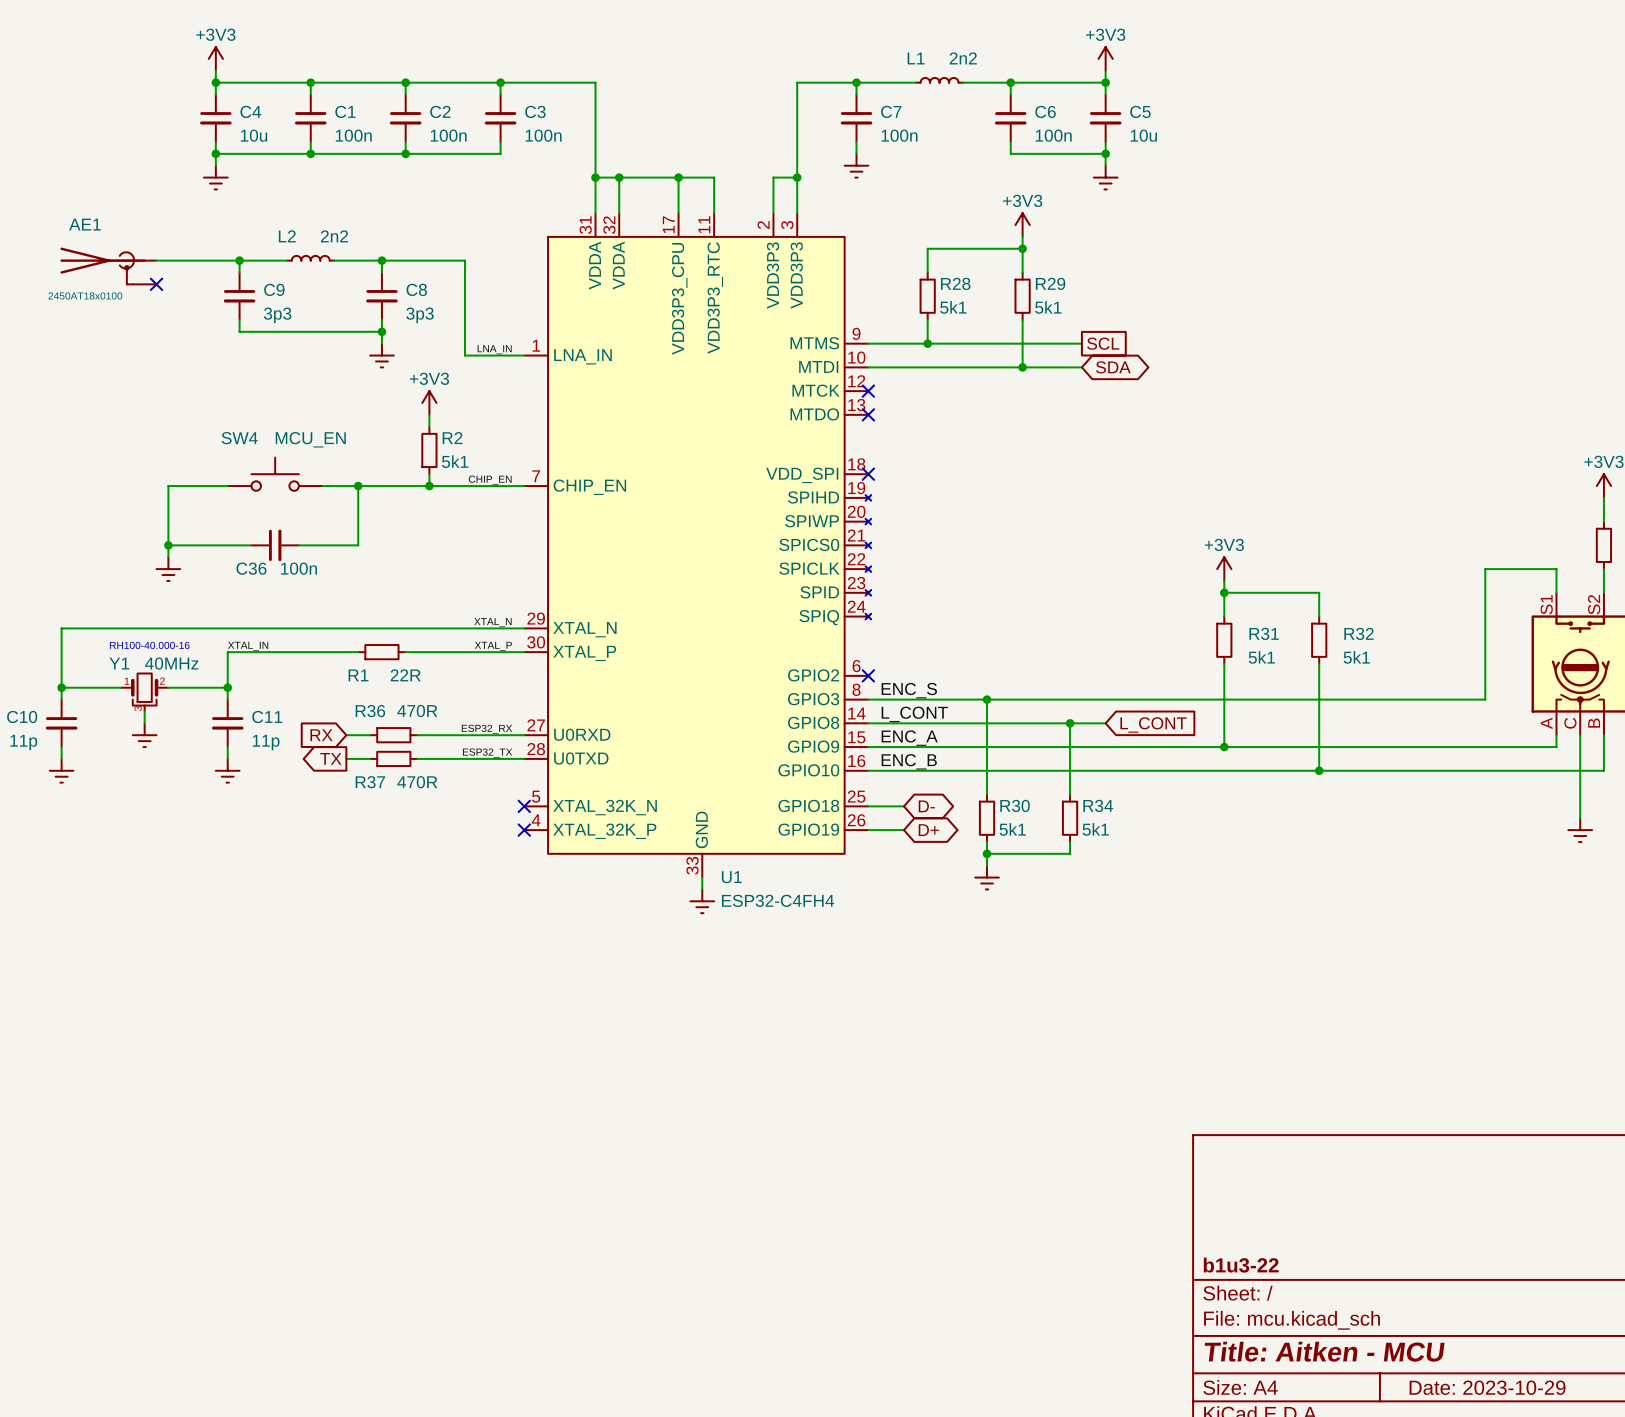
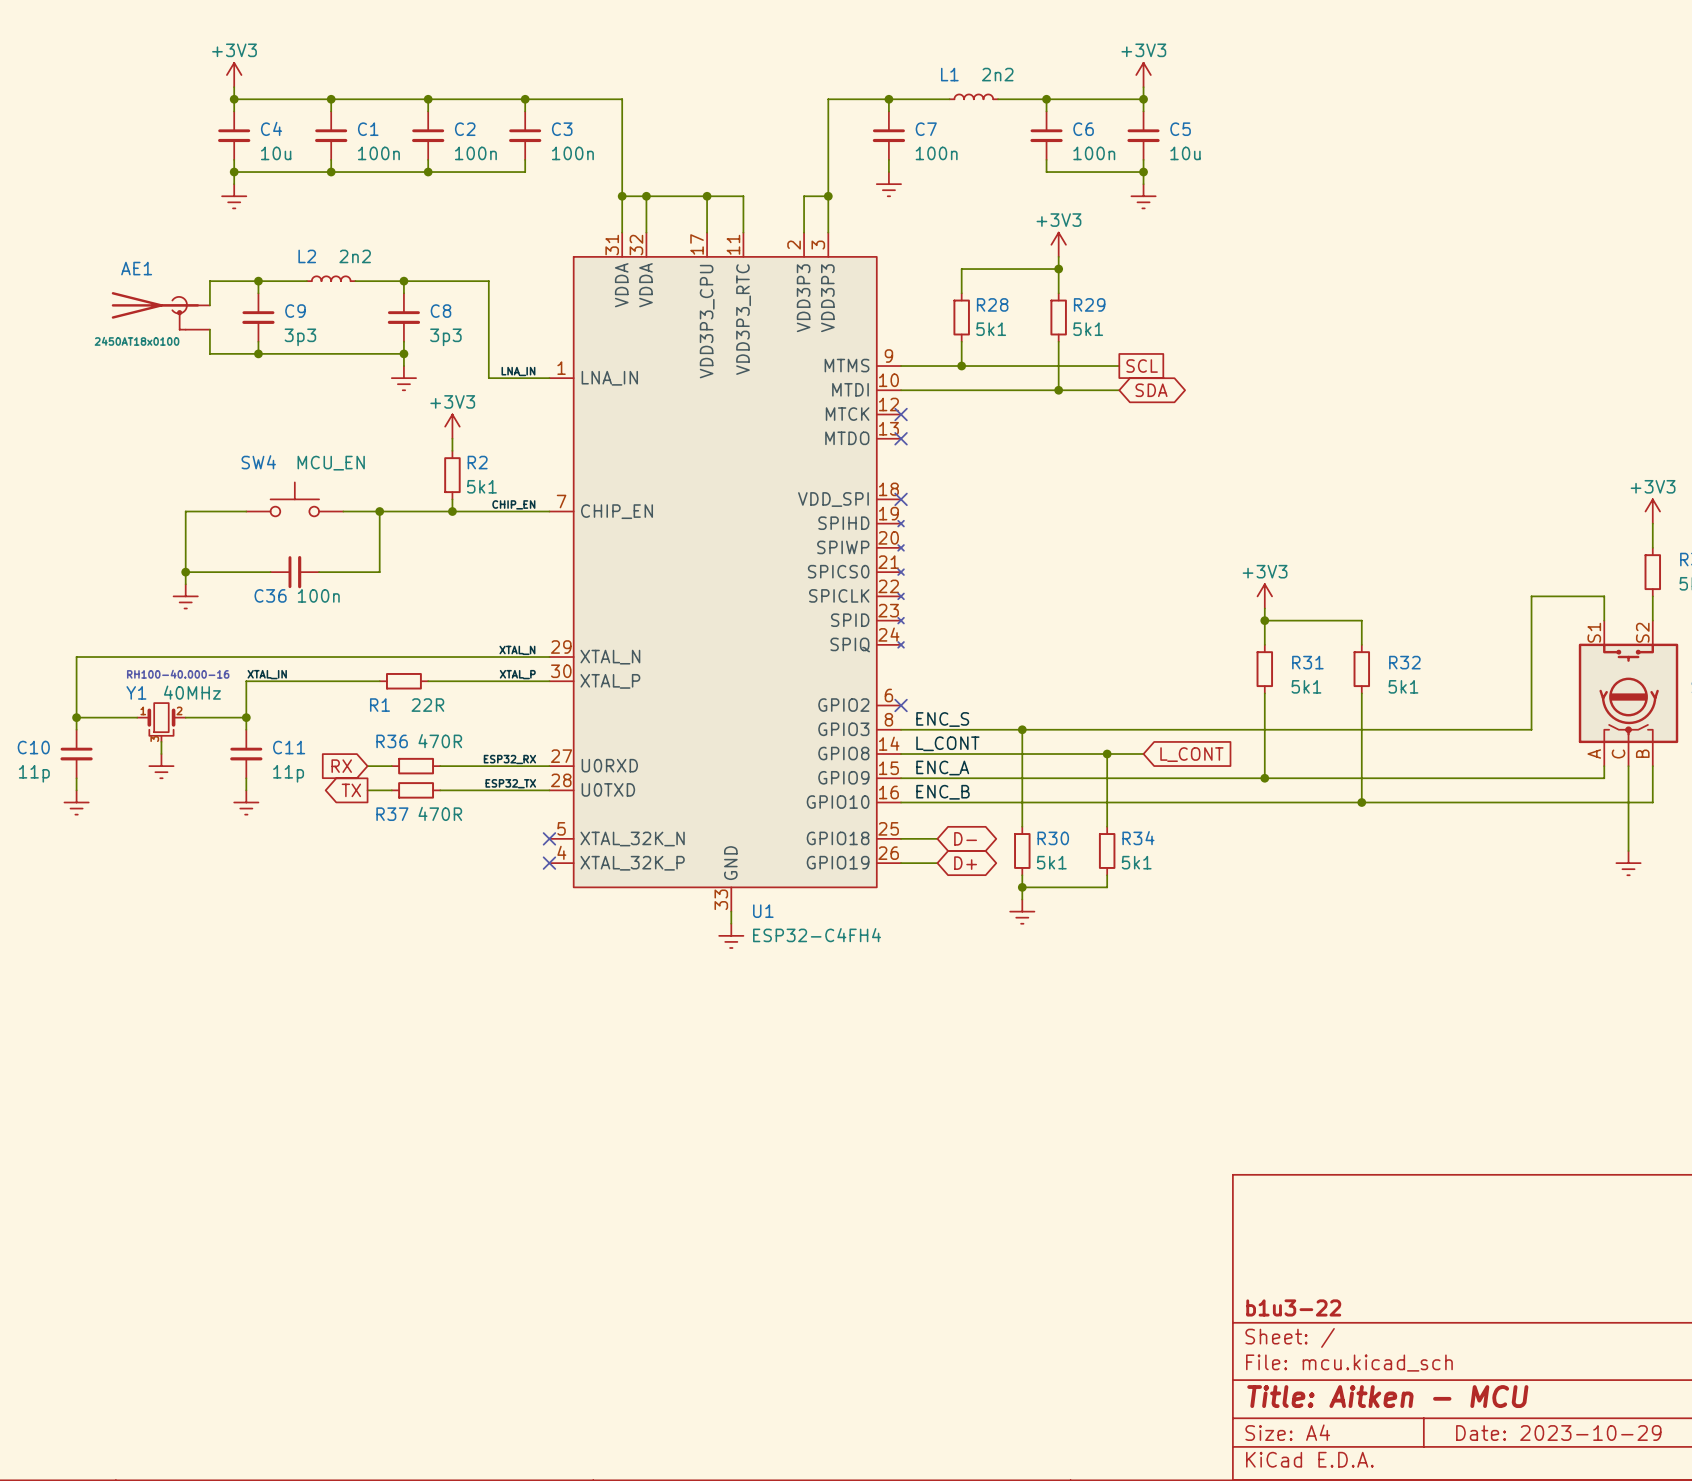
wire: (156, 260) (192, 260) -> (209, 305) (209, 281)
AE1 position: (108, 265) -> (160, 310)
no-connect mark: (156, 284) -> none
wire: none -> (209, 329) (209, 353) (258, 353)
junction: none -> (258, 353)

